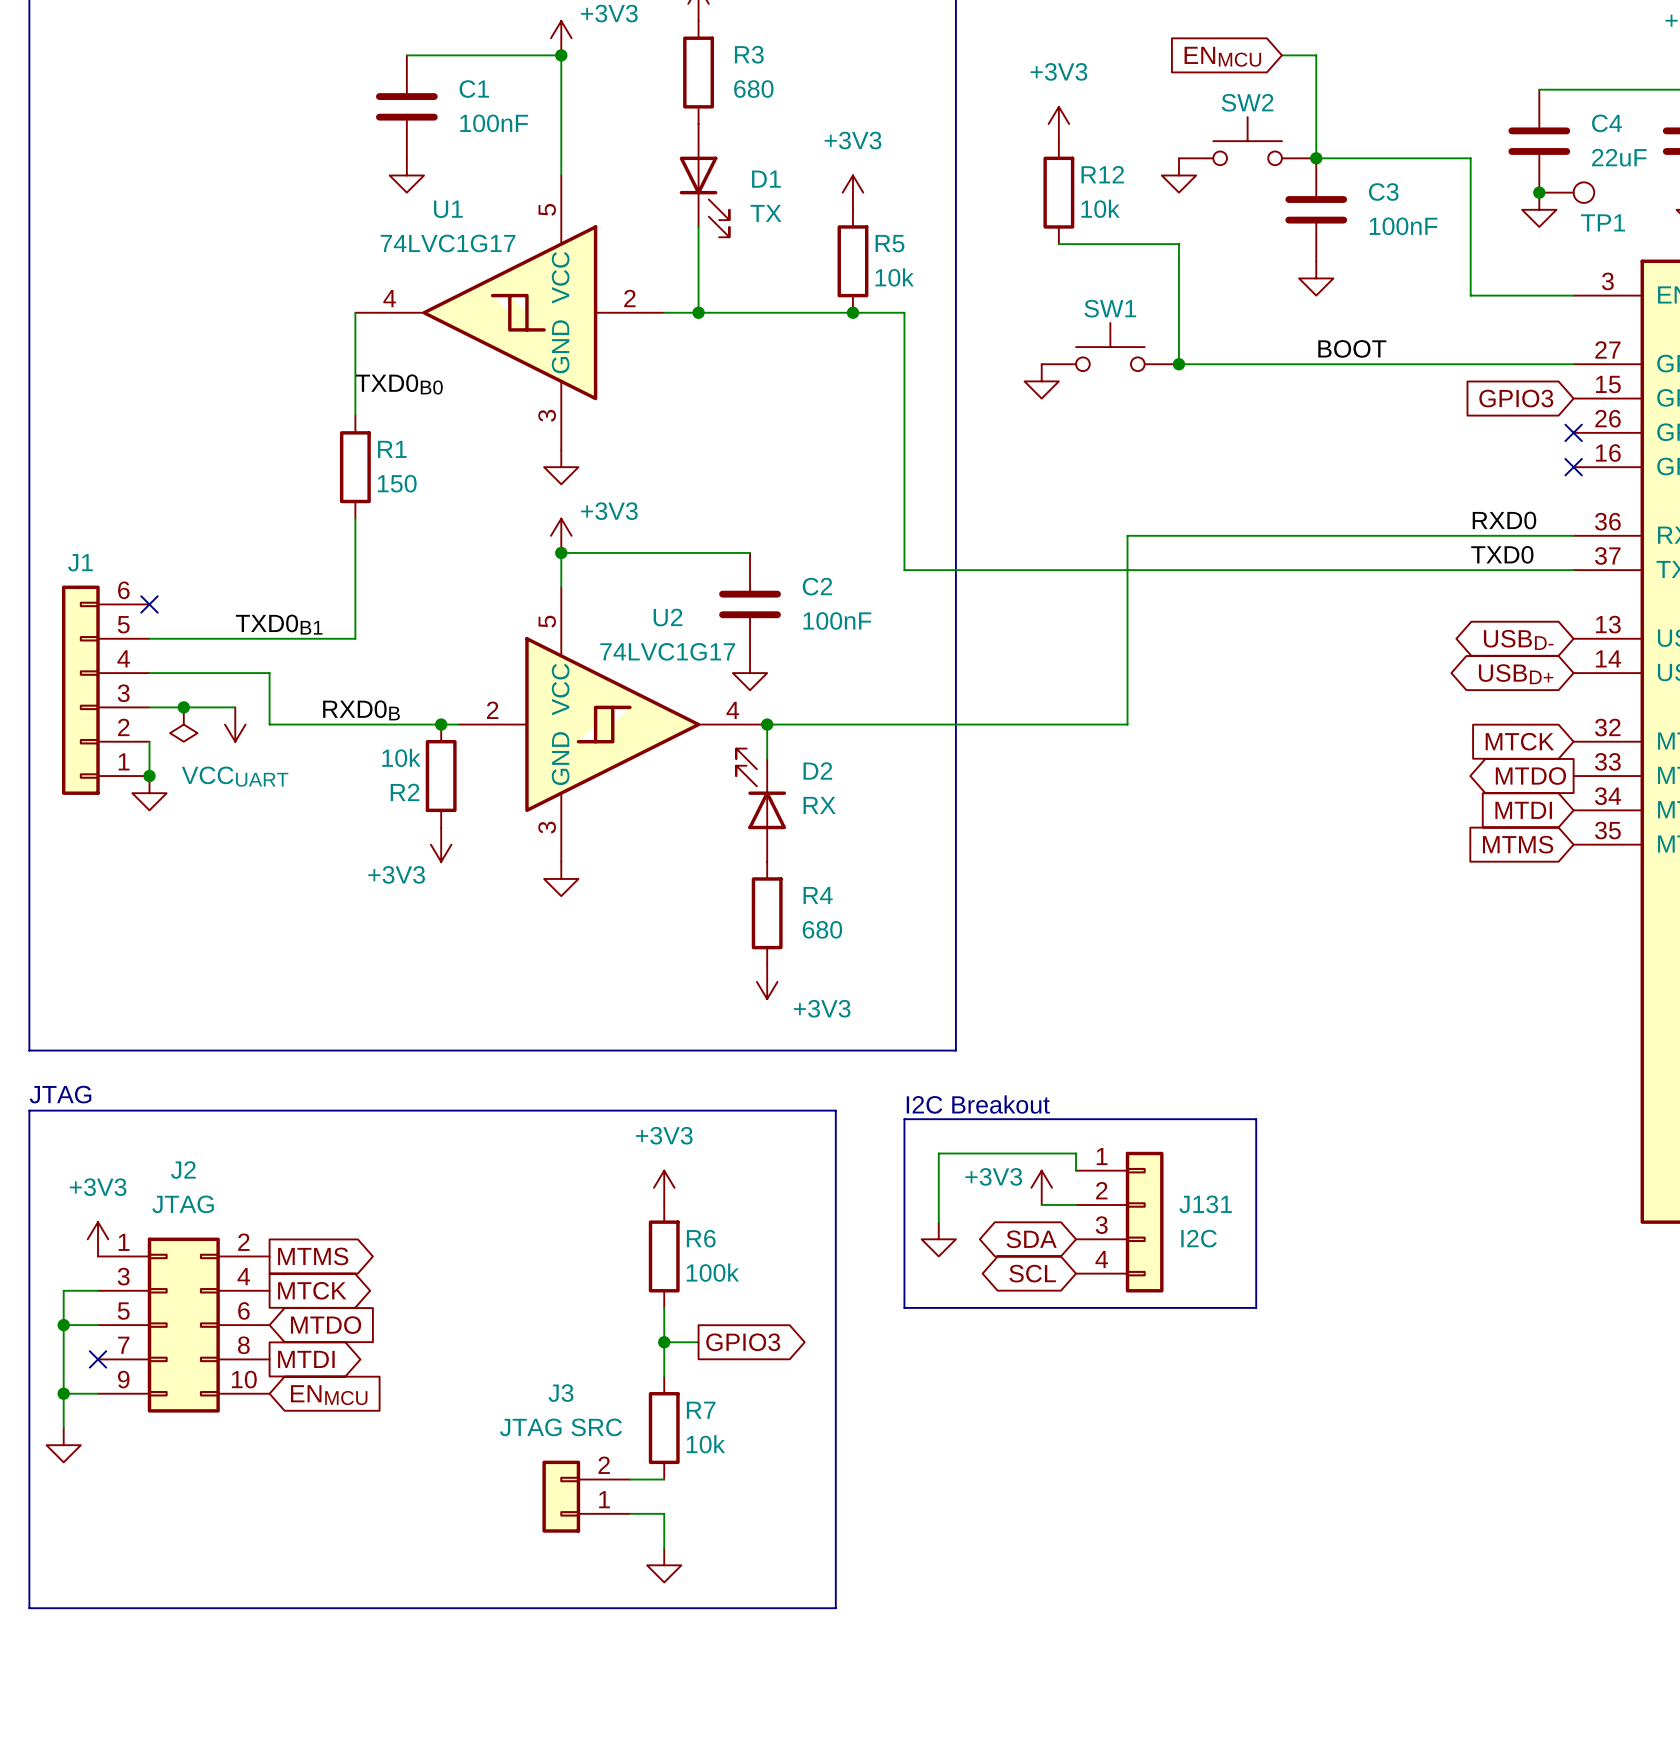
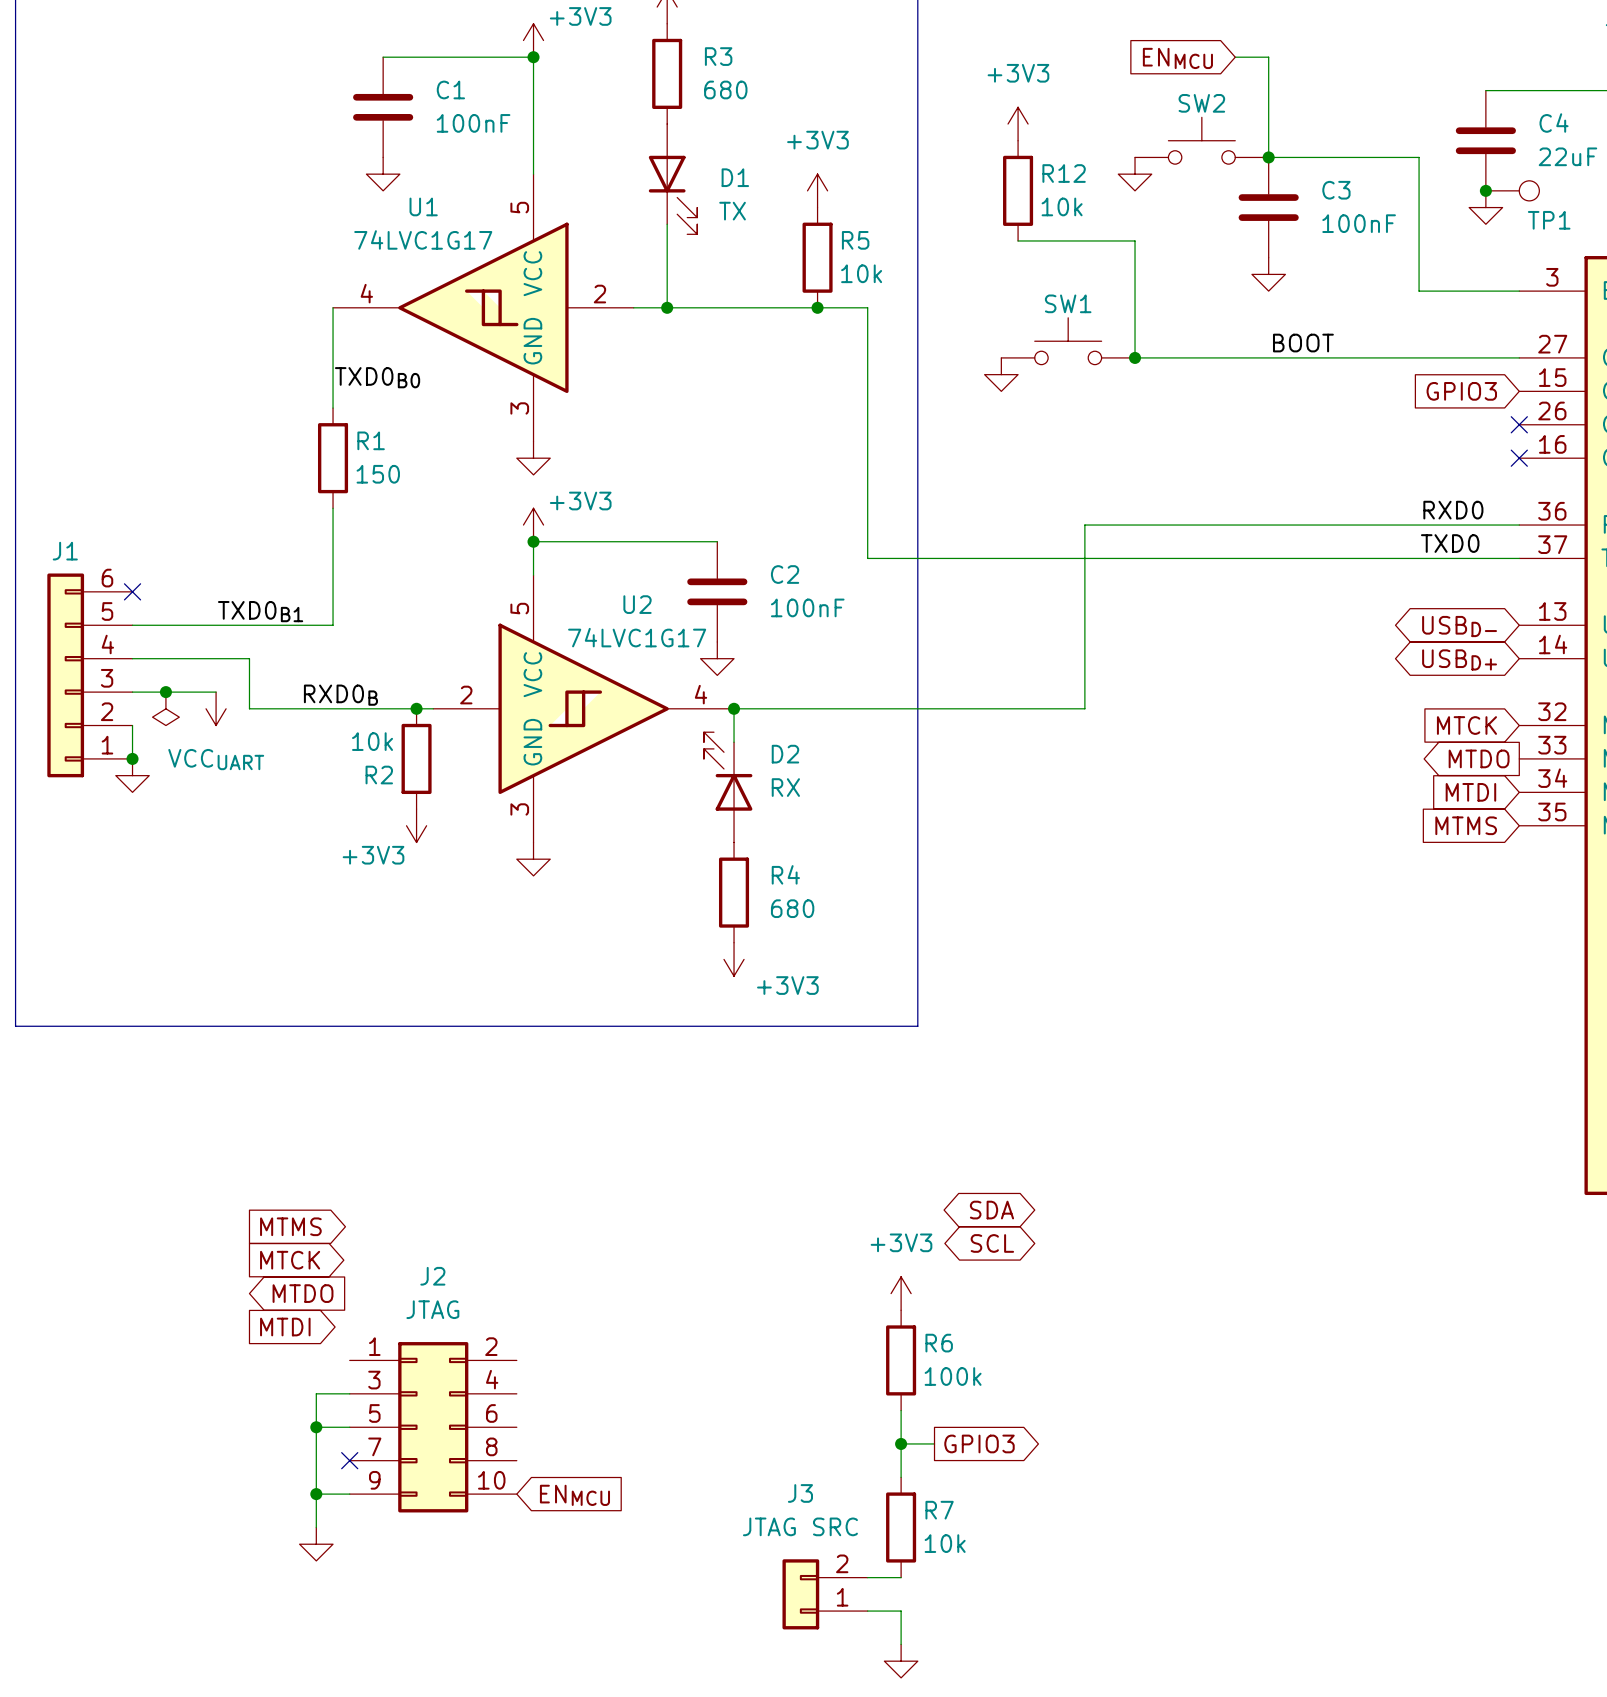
text: JTAG (60, 1094) -> none
text: I2C Breakout (978, 1104) -> none
line: (29, 1110) (835, 1110) (835, 1608) (29, 1608) (29, 1110) -> none
line: (904, 1119) (1256, 1119) (1256, 1307) (904, 1307) (904, 1119) -> none
wire: (1076, 1170) (1076, 1153) (938, 1153) (938, 1222) -> none
power symbol: +3V3 (664, 1187) -> none
power symbol: +3V3 (1041, 1187) -> none
wire: (1041, 1204) (1076, 1204) -> none
J131: I2C (1119, 1222) -> none
power symbol: +3V3 (98, 1239) -> none
power symbol: (938, 1239) -> none
R6 position: (664, 1256) -> (901, 1360)
wire: (98, 1290) (63, 1290) (63, 1428) -> (349, 1393) (316, 1393) (316, 1527)
wire: (664, 1307) (664, 1376) -> (901, 1410) (901, 1477)
wire: (63, 1325) (98, 1325) -> (316, 1427) (349, 1427)
junction: (63, 1325) -> none
J2 position: (183, 1325) -> (433, 1427)
power symbol: none -> +3V3 (901, 1293)
wire: (664, 1342) (698, 1342) -> (901, 1443) (934, 1443)
junction: (664, 1342) -> none
global label position: GPIO3 (743, 1342) -> GPIO3 (979, 1443)
no-connect mark: (98, 1359) -> none
wire: (63, 1393) (98, 1393) -> (316, 1494) (349, 1494)
junction: (63, 1393) -> none
global label position: ENMCU (329, 1395) -> ENMCU (574, 1495)
R7 position: (664, 1428) -> (901, 1527)
power symbol: (63, 1445) -> none
junction: none -> (316, 1427)
wire: (629, 1479) (664, 1479) -> (867, 1577) (901, 1577)
junction: none -> (901, 1443)
no-connect mark: none -> (349, 1460)
J3 position: (586, 1496) -> (825, 1594)
wire: (629, 1513) (664, 1513) (664, 1548) -> (867, 1611) (901, 1611) (901, 1644)
junction: none -> (316, 1494)
power symbol: (664, 1565) -> none
power symbol: none -> (316, 1544)
power symbol: none -> (901, 1661)

